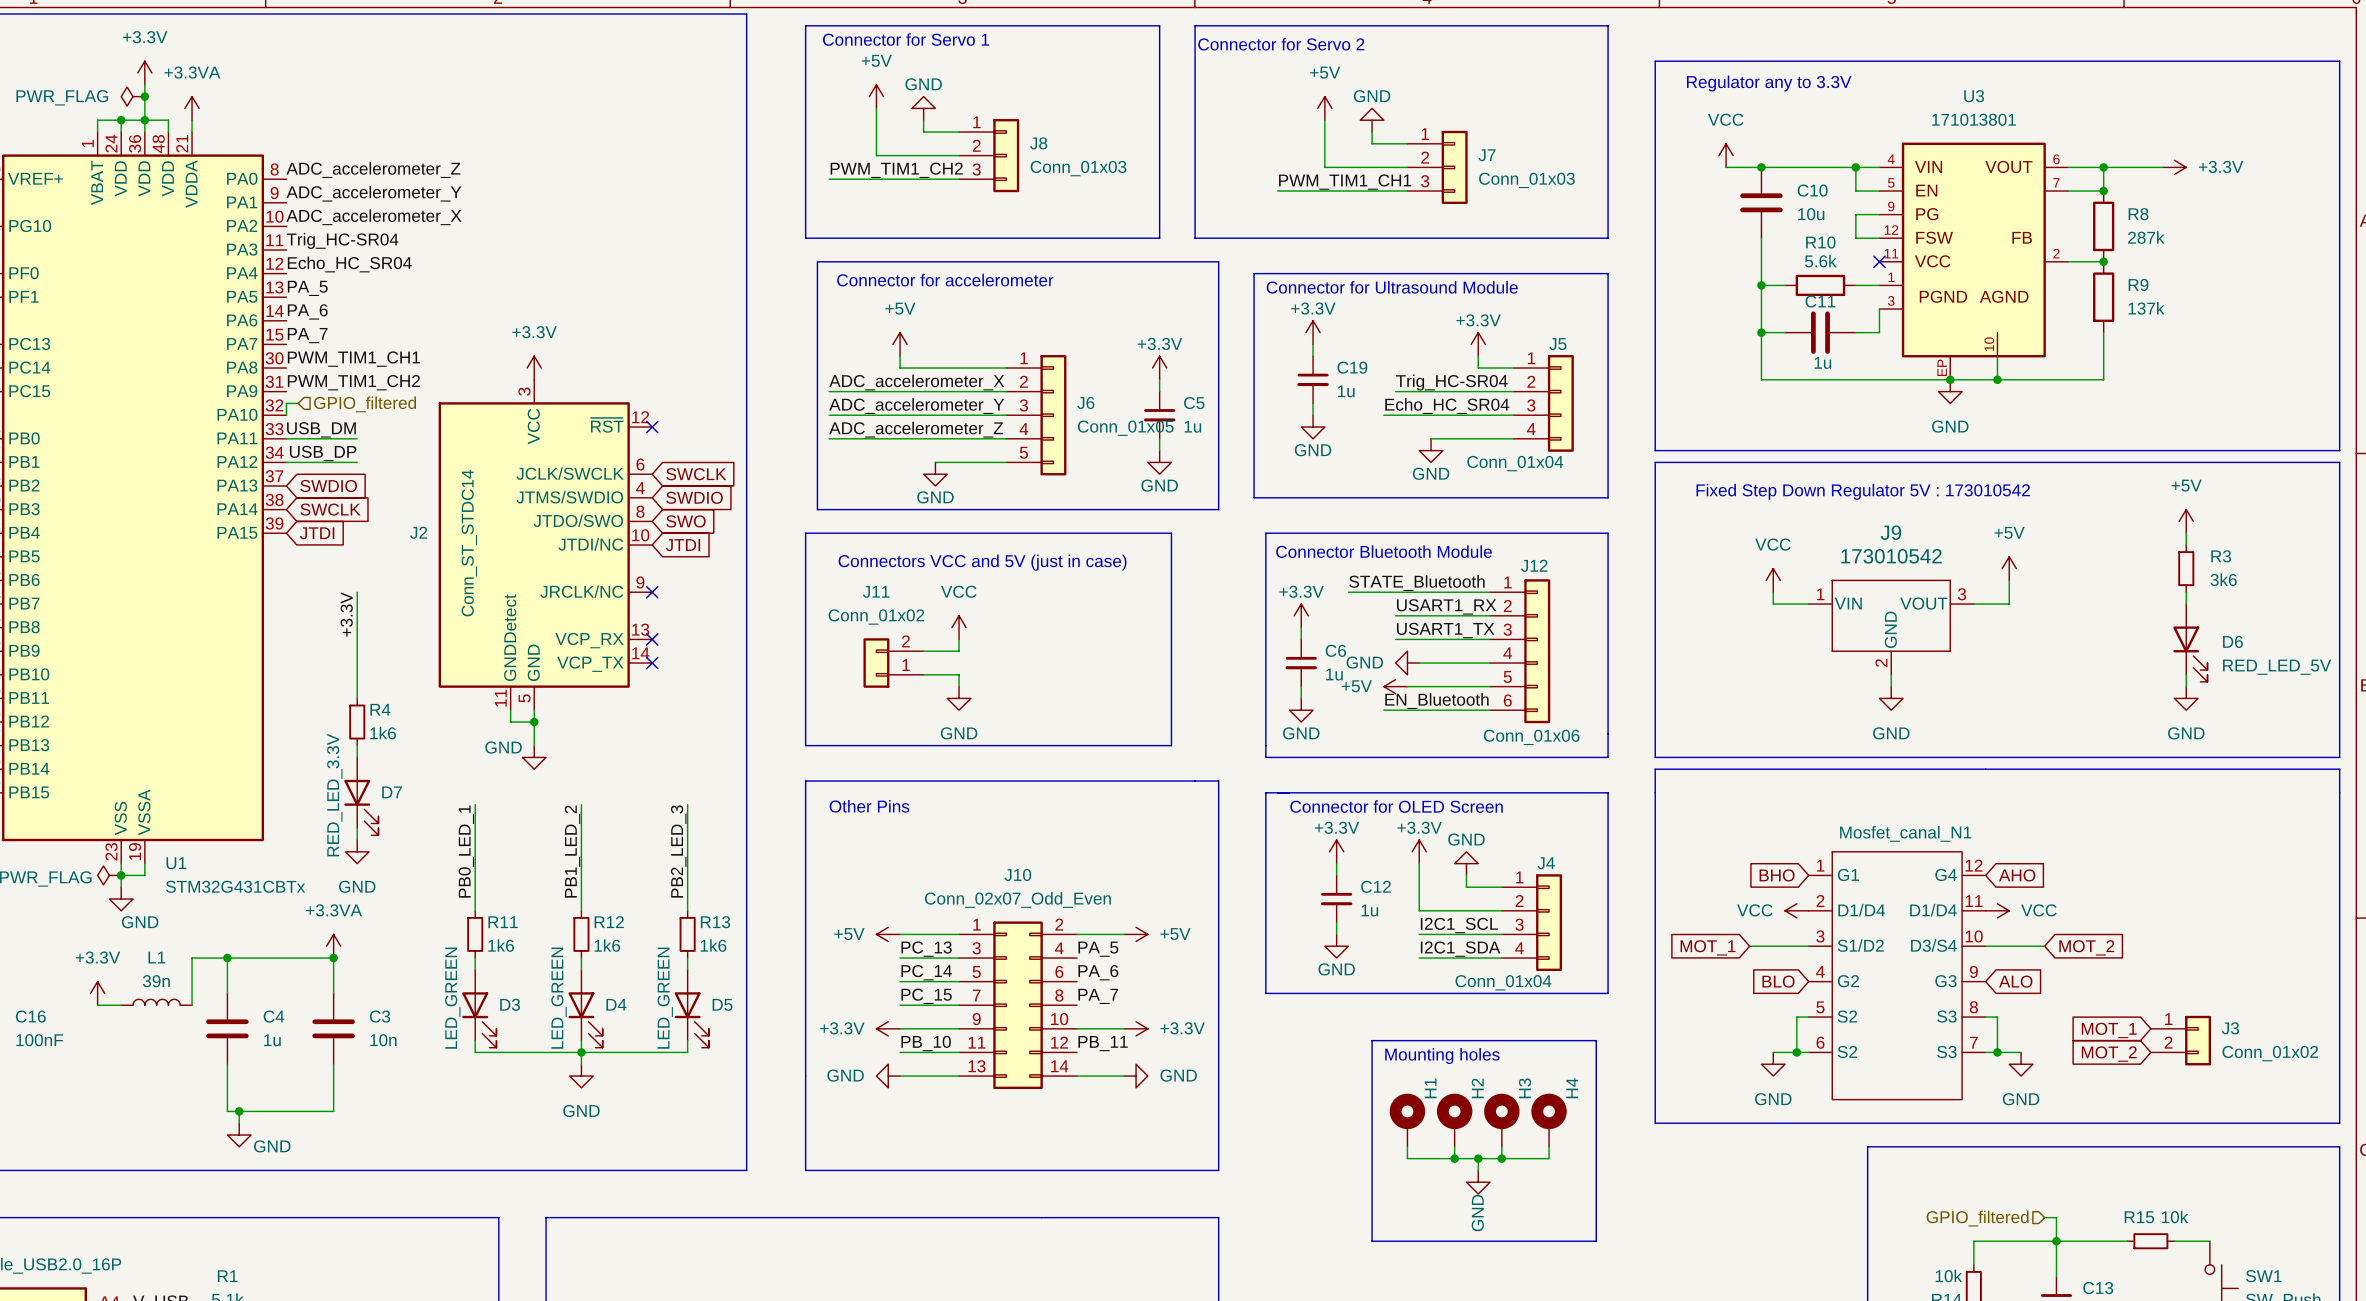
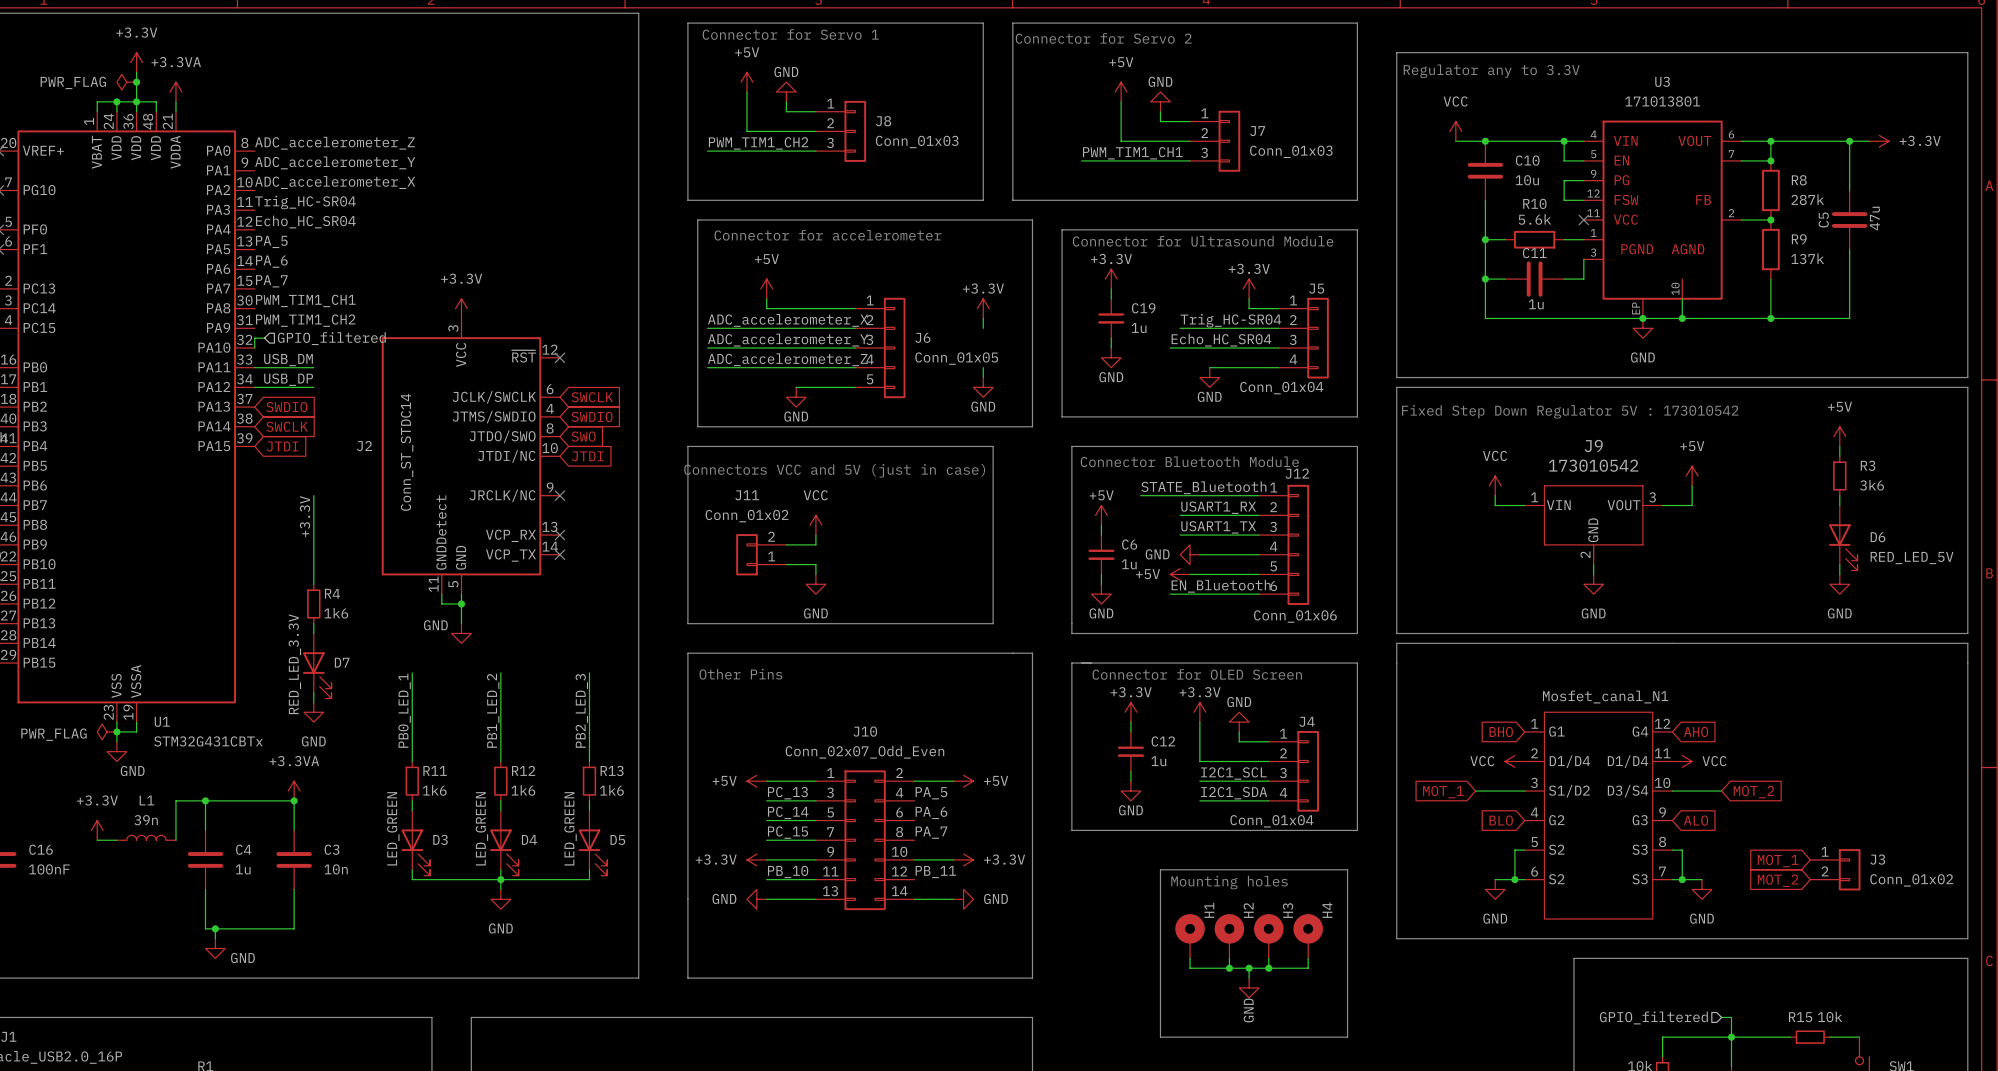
power symbol position: +3.3V (2174, 167) -> +3.3V (1879, 141)
wire: none -> (1849, 141) (1849, 190)
junction: none -> (1849, 141)
wire: none -> (1849, 249) (1849, 318) (1770, 318)
junction: none -> (1770, 318)
C5 symbol: [1143, 391, 1176, 439] -> [1831, 190, 1868, 250]
C5 name position: C5 (1194, 403) -> C5 (1823, 219)
C5 value: 1u (1192, 426) -> 47u (1874, 218)
power symbol: +3.3V (1301, 615) -> +5V (1101, 515)

